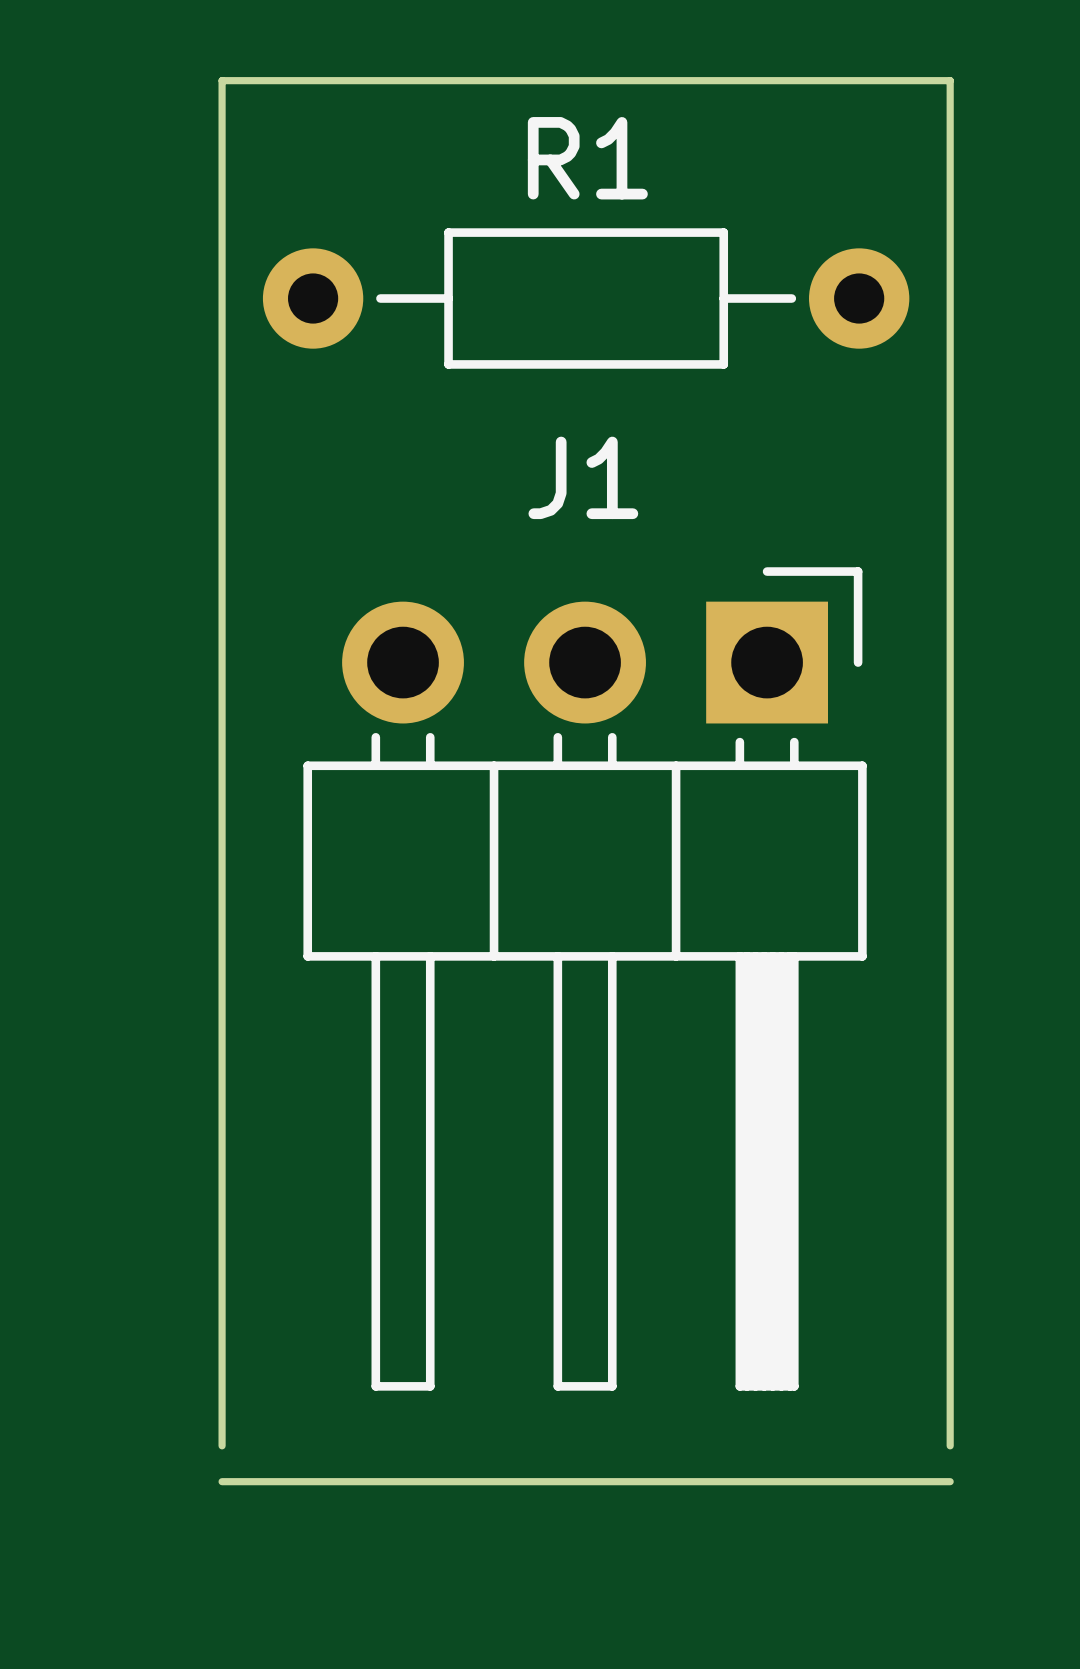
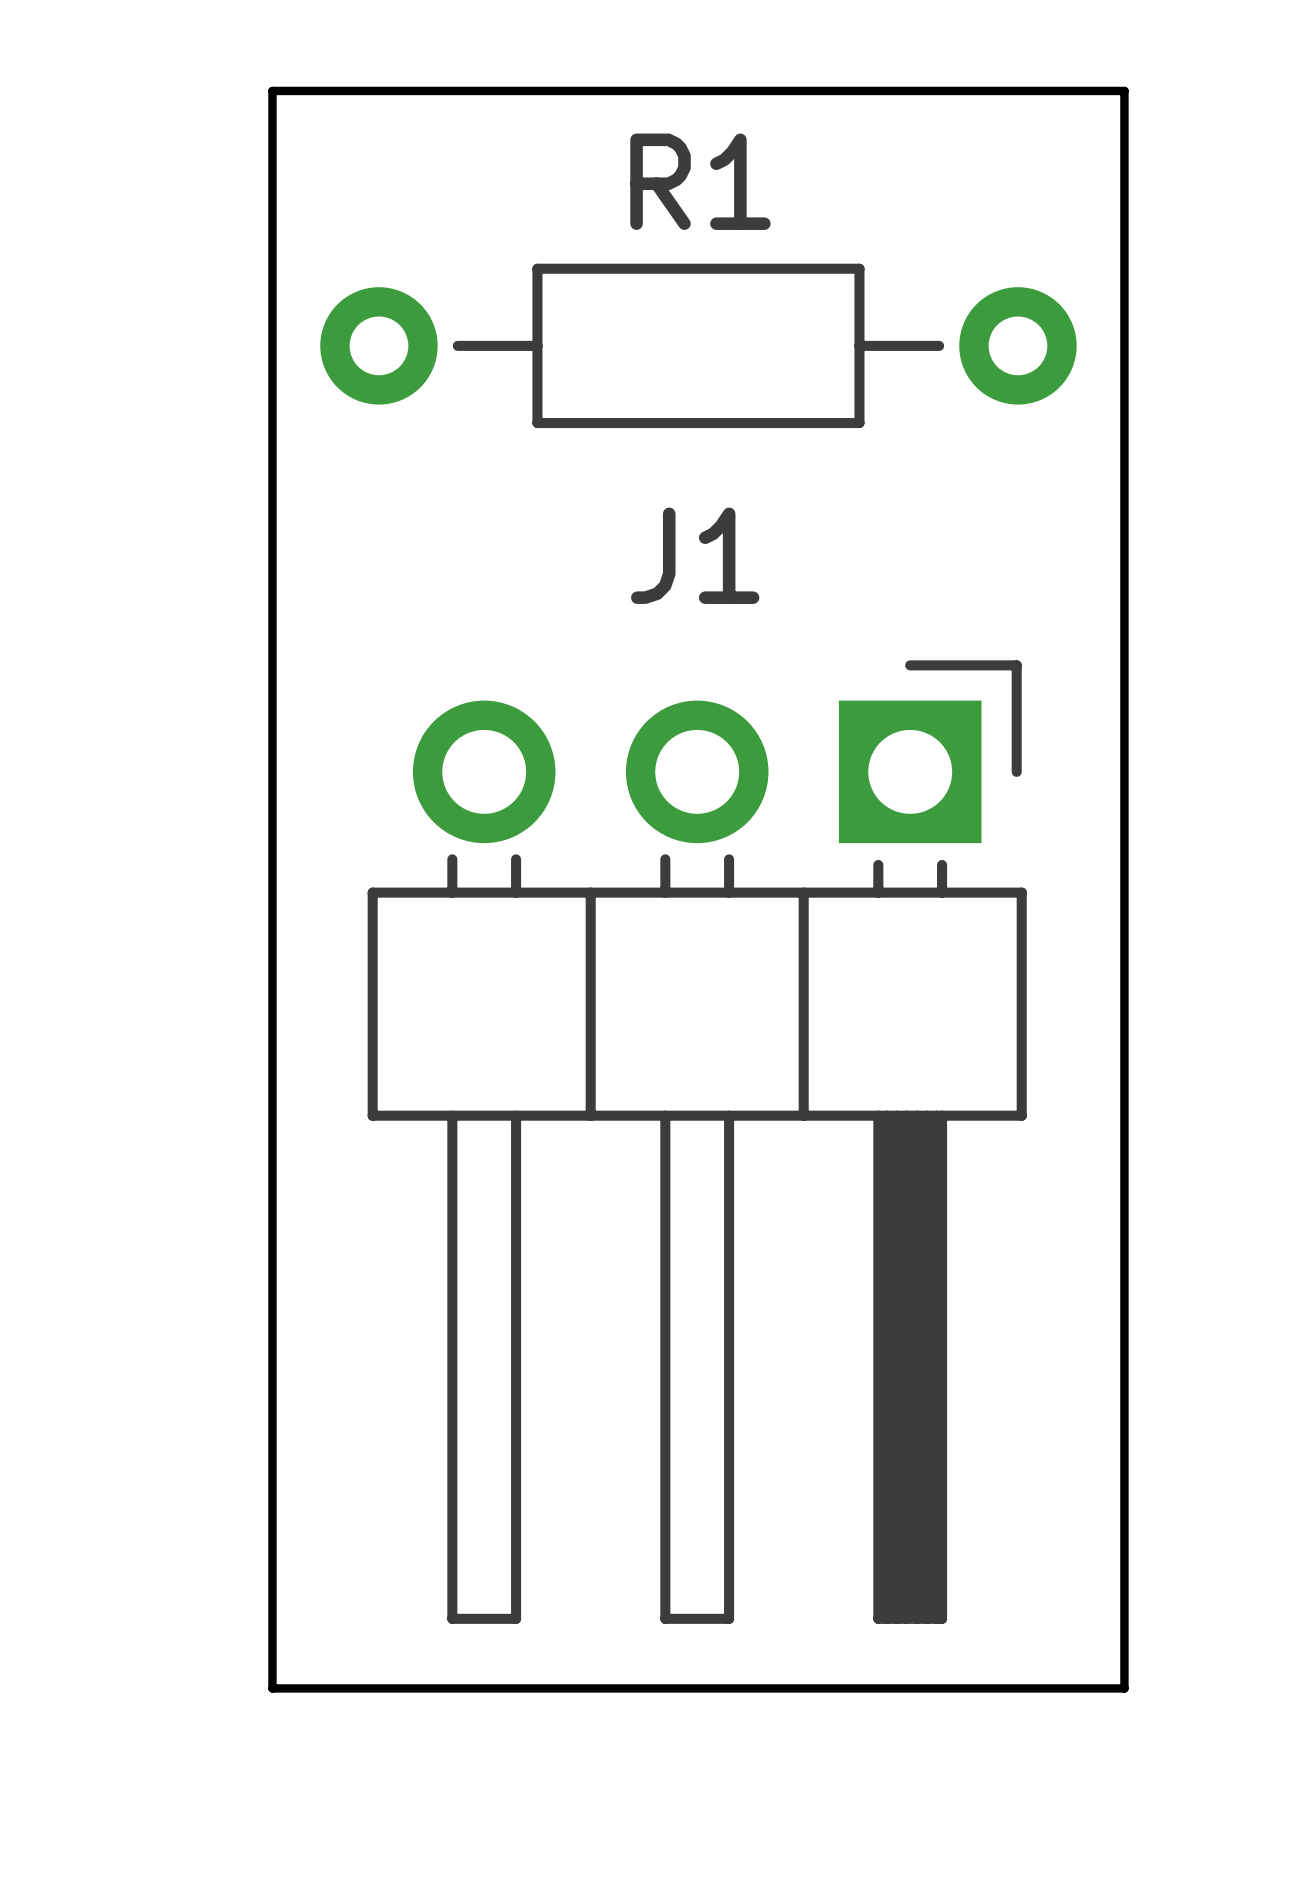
board edge: (222, 1481) (950, 1481) -> (272, 1688) (1124, 1688)

